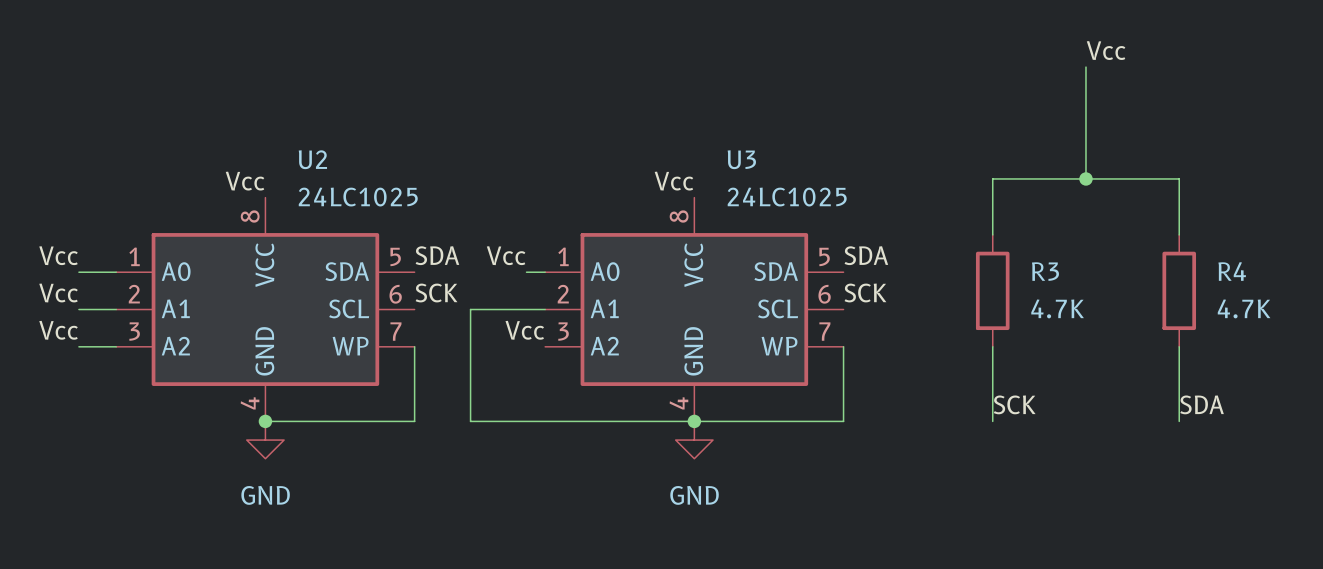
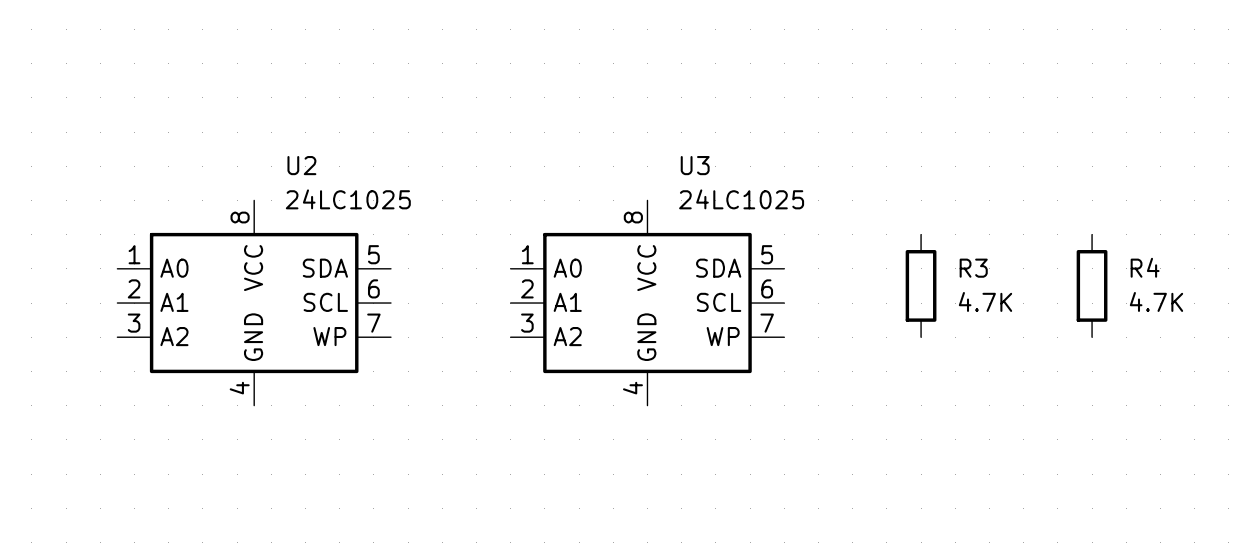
label: Vcc (1106, 50) -> none
wire: (1085, 67) (1085, 178) -> none
junction: (1085, 178) -> none
label: Vcc (245, 181) -> none
label: Vcc (673, 181) -> none
wire: (992, 234) (992, 178) (1179, 178) (1179, 234) -> none
label: Vcc (58, 255) -> none
label: SDA (437, 255) -> none
label: Vcc (506, 255) -> none
label: SDA (866, 255) -> none
wire: (78, 272) (116, 272) -> none
wire: (526, 272) (545, 272) -> none
label: SCK (436, 292) -> none
label: SCK (865, 292) -> none
label: Vcc (58, 293) -> none
wire: (78, 309) (116, 309) -> none
wire: (545, 309) (470, 309) (470, 421) (843, 421) (843, 346) -> none
label: Vcc (58, 330) -> none
label: Vcc (524, 330) -> none
wire: (78, 346) (116, 346) -> none
wire: (414, 346) (414, 421) (265, 421) -> none
wire: (992, 346) (992, 421) -> none
wire: (1179, 346) (1179, 421) -> none
label: SCK (1014, 404) -> none
label: SDA (1202, 404) -> none
junction: (265, 421) -> none
junction: (694, 421) -> none
power symbol: GND (265, 440) -> none
power symbol: GND (694, 440) -> none

